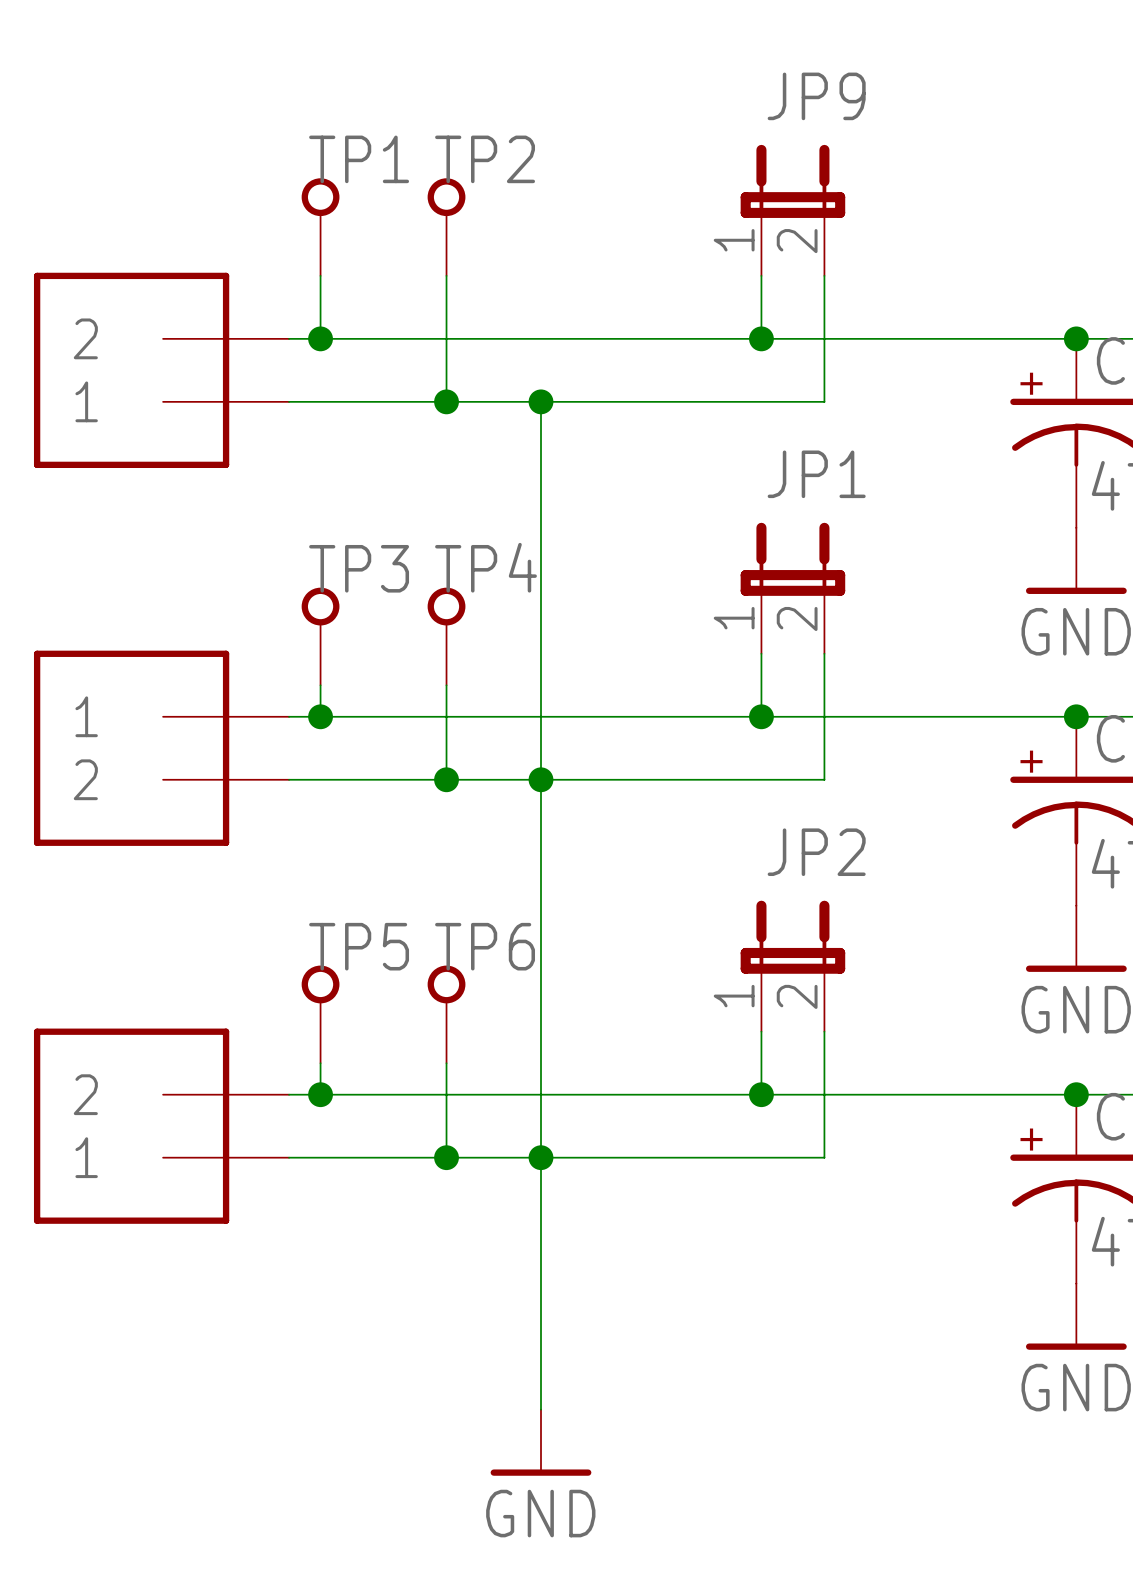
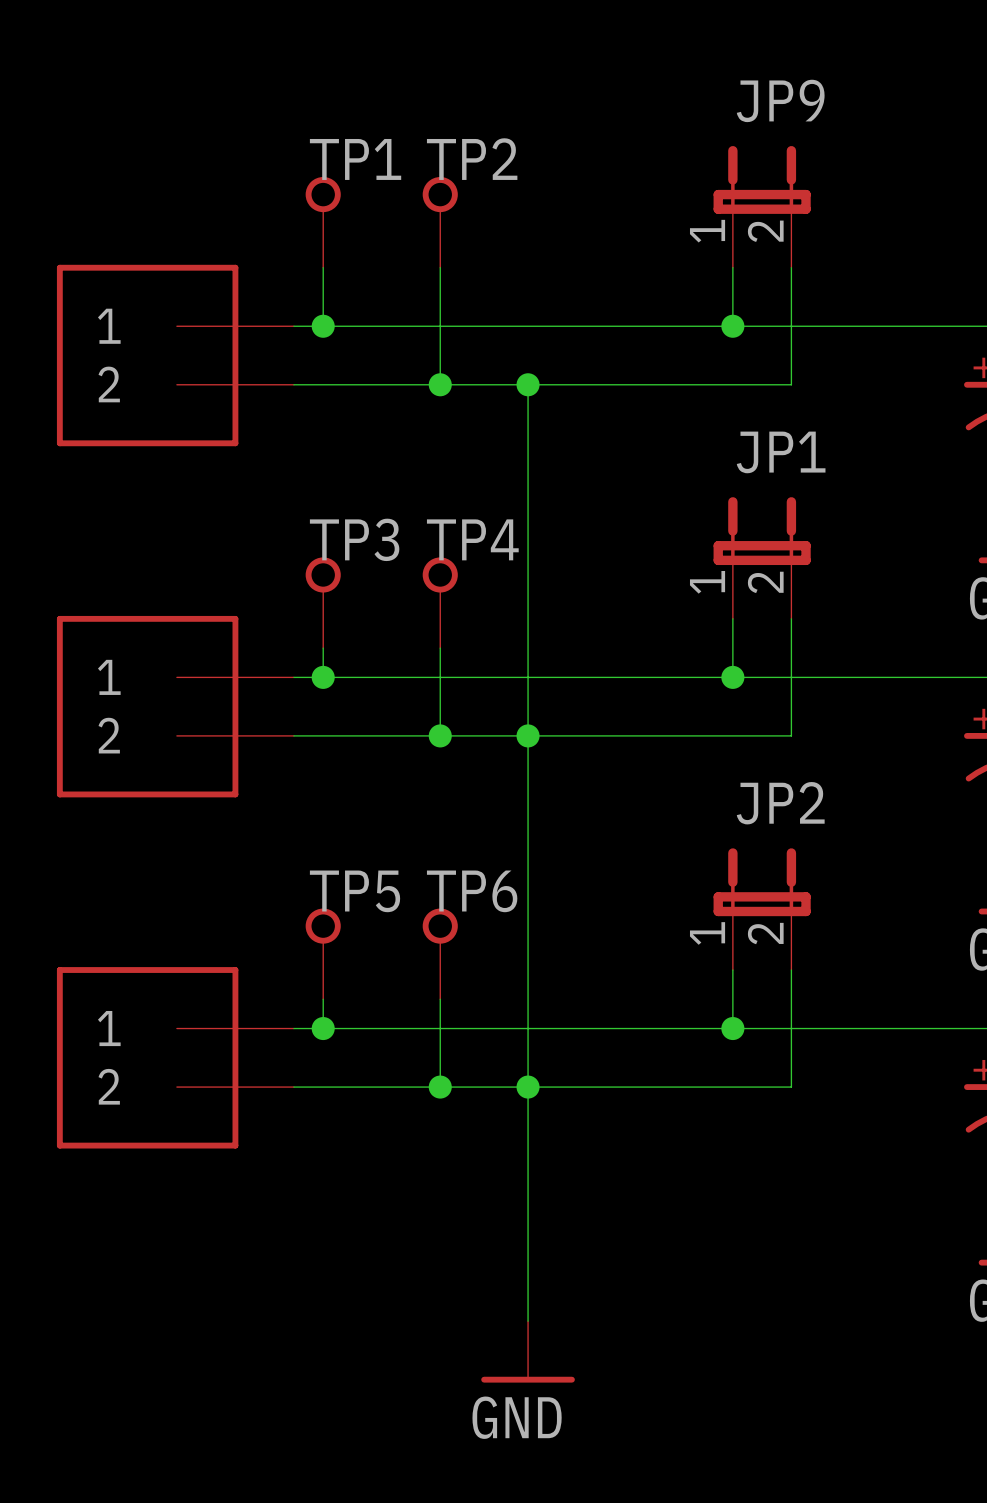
part flip: as is (131, 370) -> up-down (147, 355)
part flip: as is (131, 1126) -> up-down (147, 1057)

